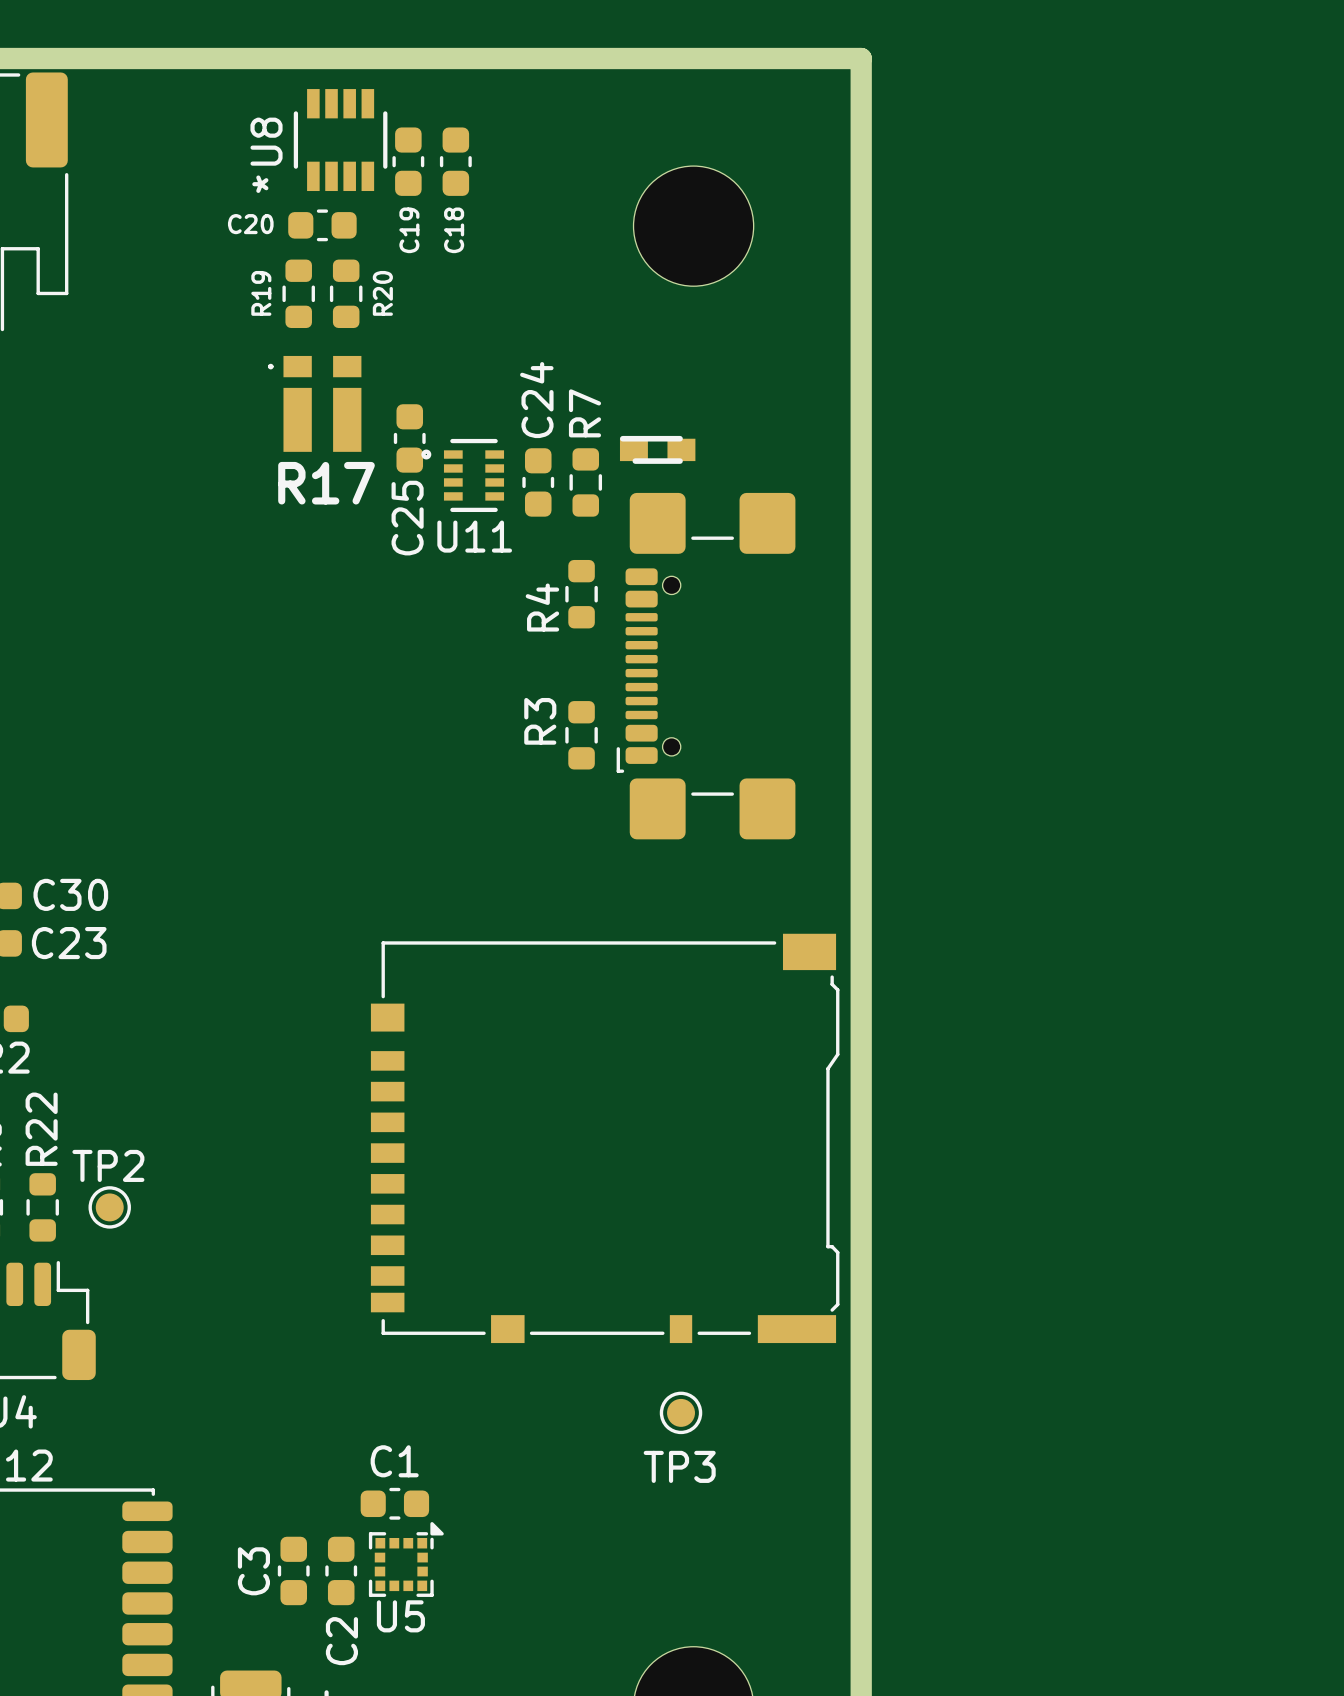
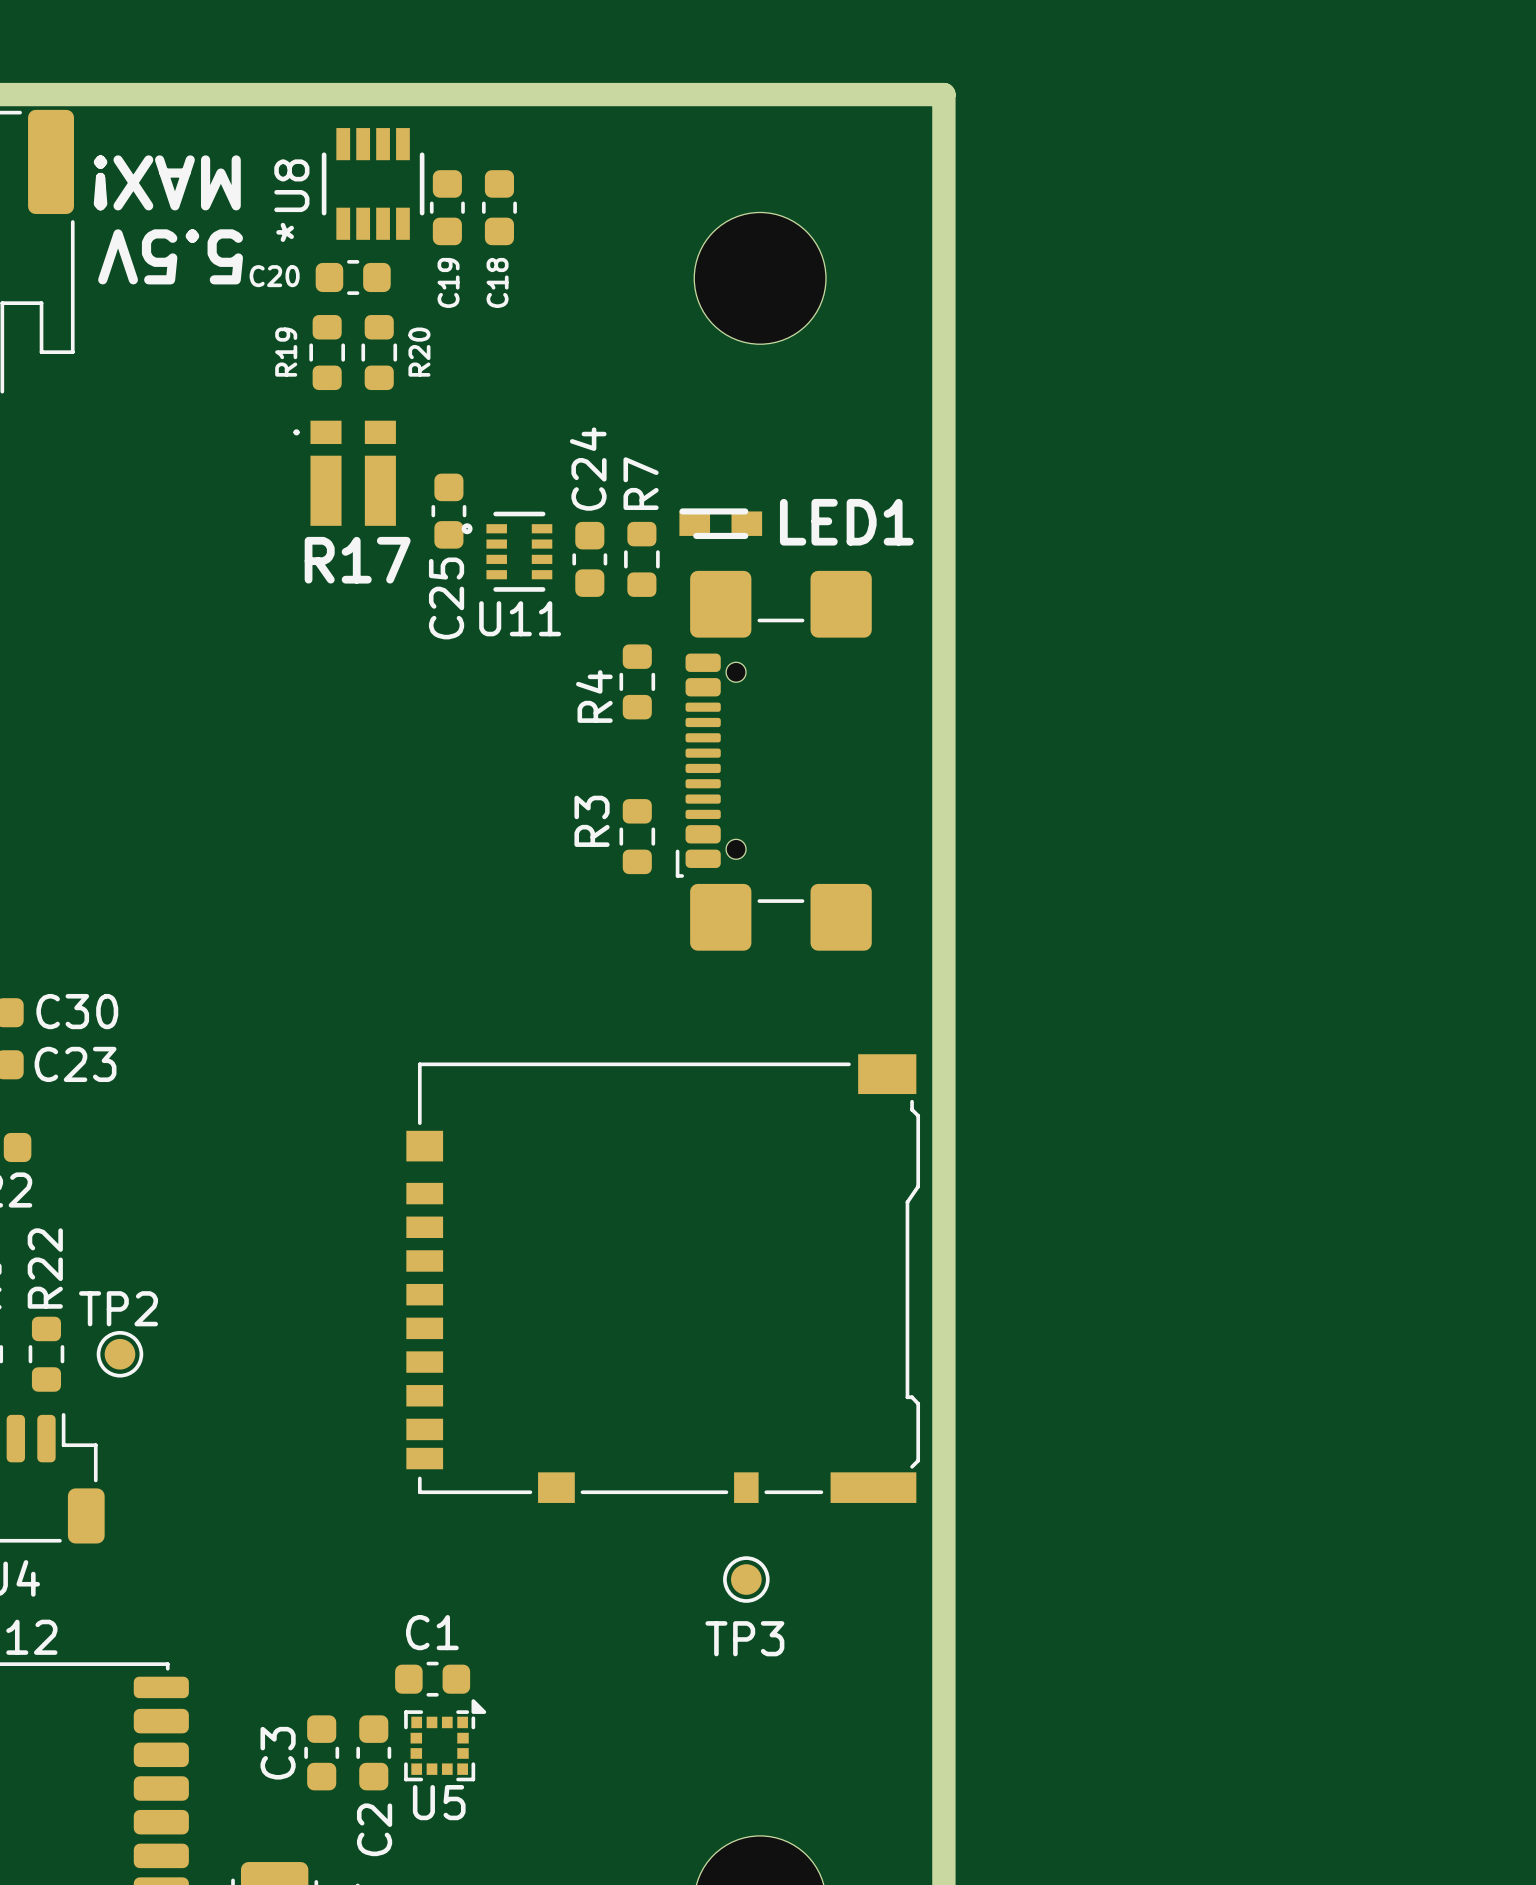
text: none -> MAX! (167, 182)
text: none -> 5.5V (170, 256)
LED1 name: none -> LED1 (846, 522)

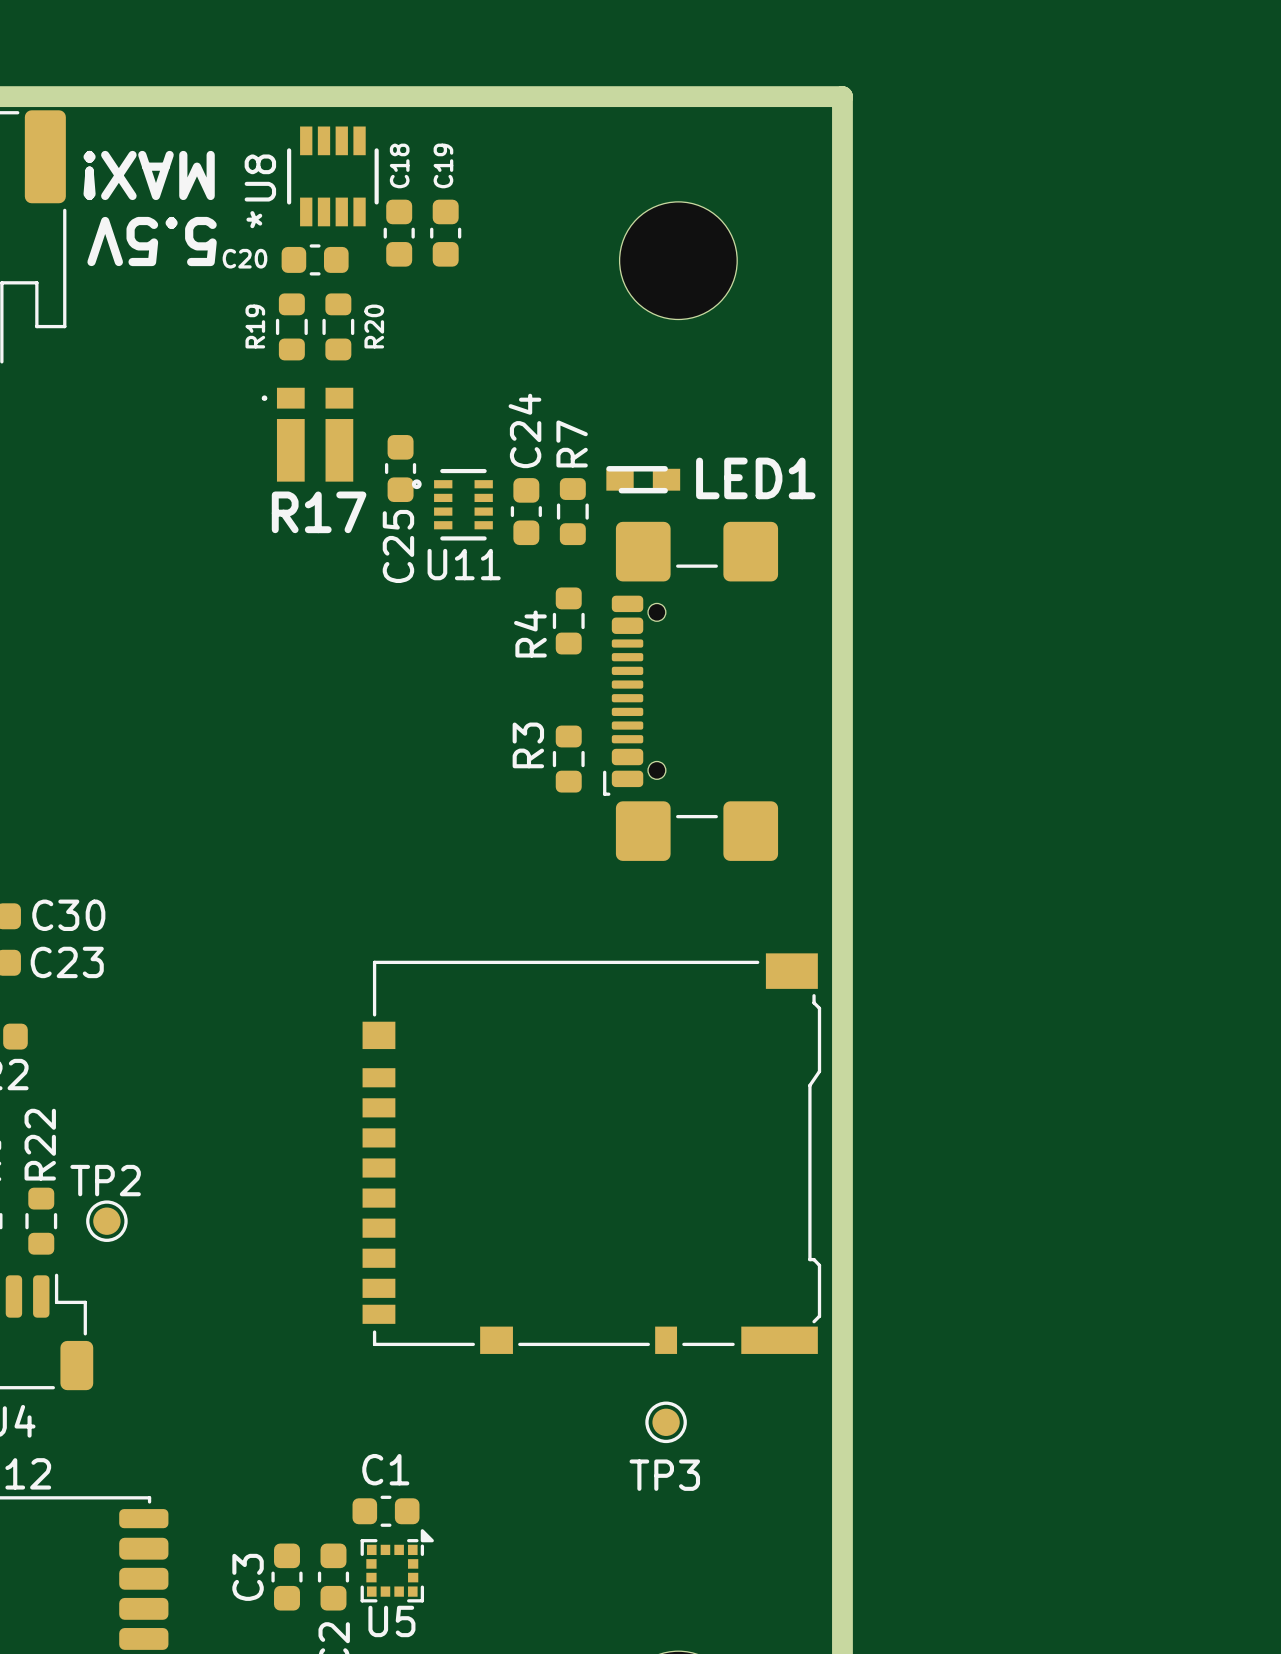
C19 position: (447, 207) -> (445, 233)
C18 position: (499, 207) -> (399, 233)
C19 name position: C19 (448, 282) -> C19 (443, 165)
C18 name position: C18 (497, 282) -> C18 (399, 165)

